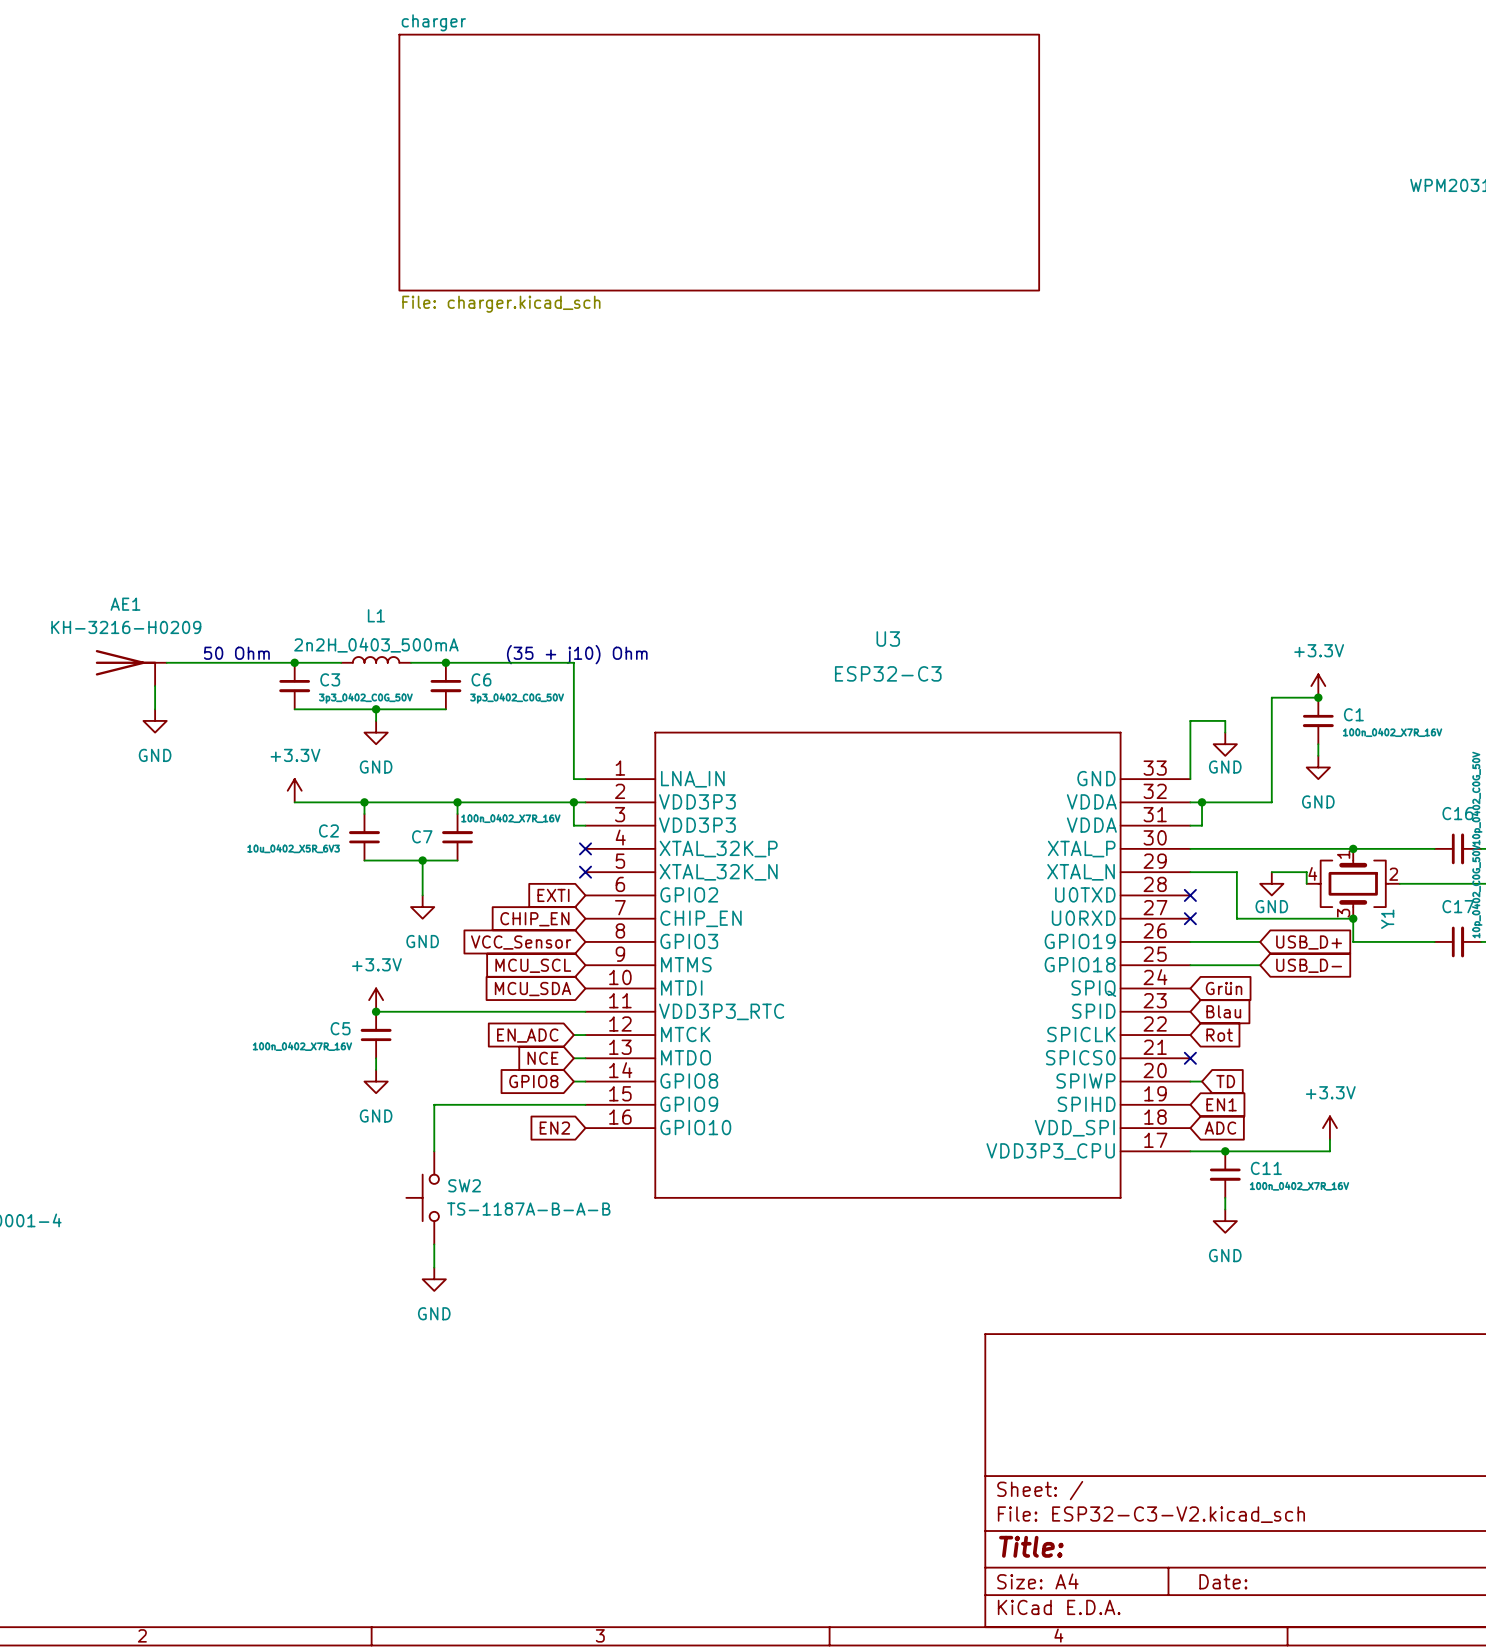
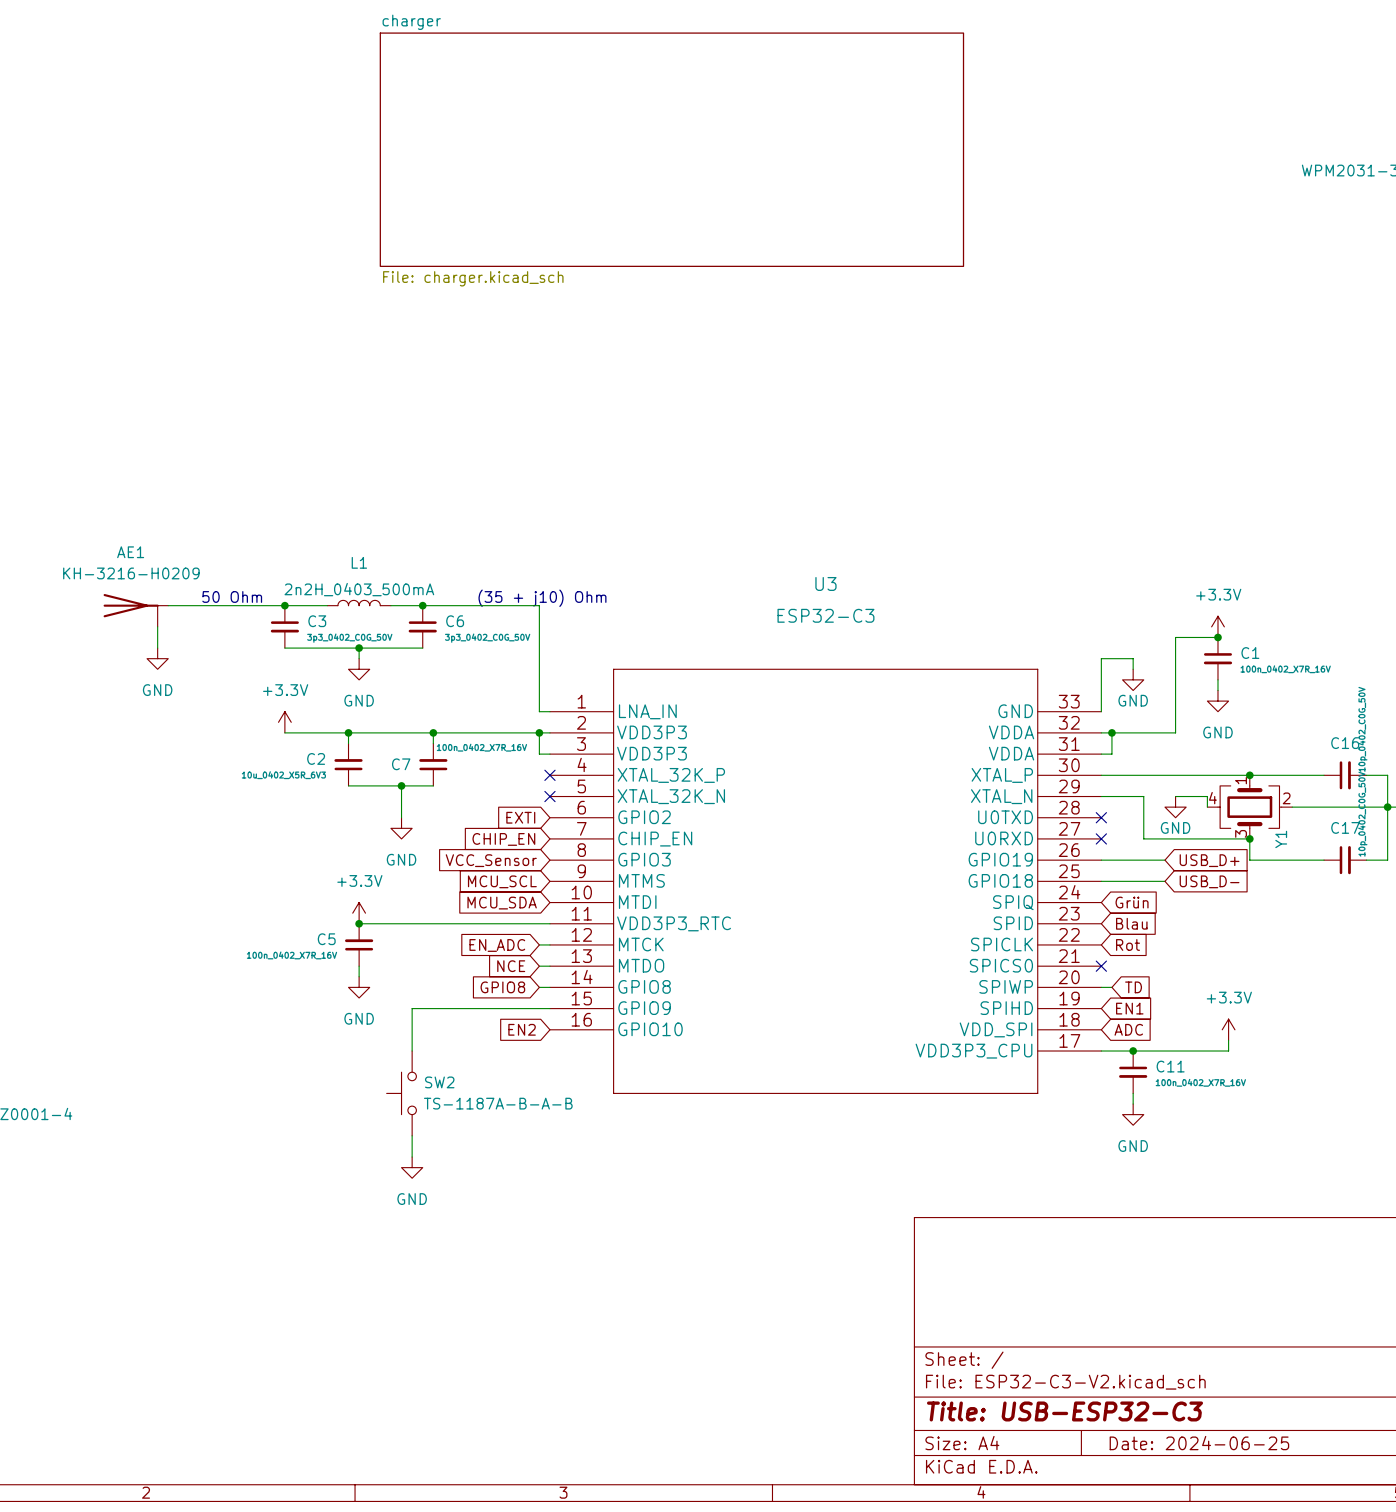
title block: Title: (1031, 1546) -> Title: USB-ESP32-C3 (1065, 1411)
title block: Date: (1223, 1581) -> Date: 2024-06-25 (1199, 1443)

